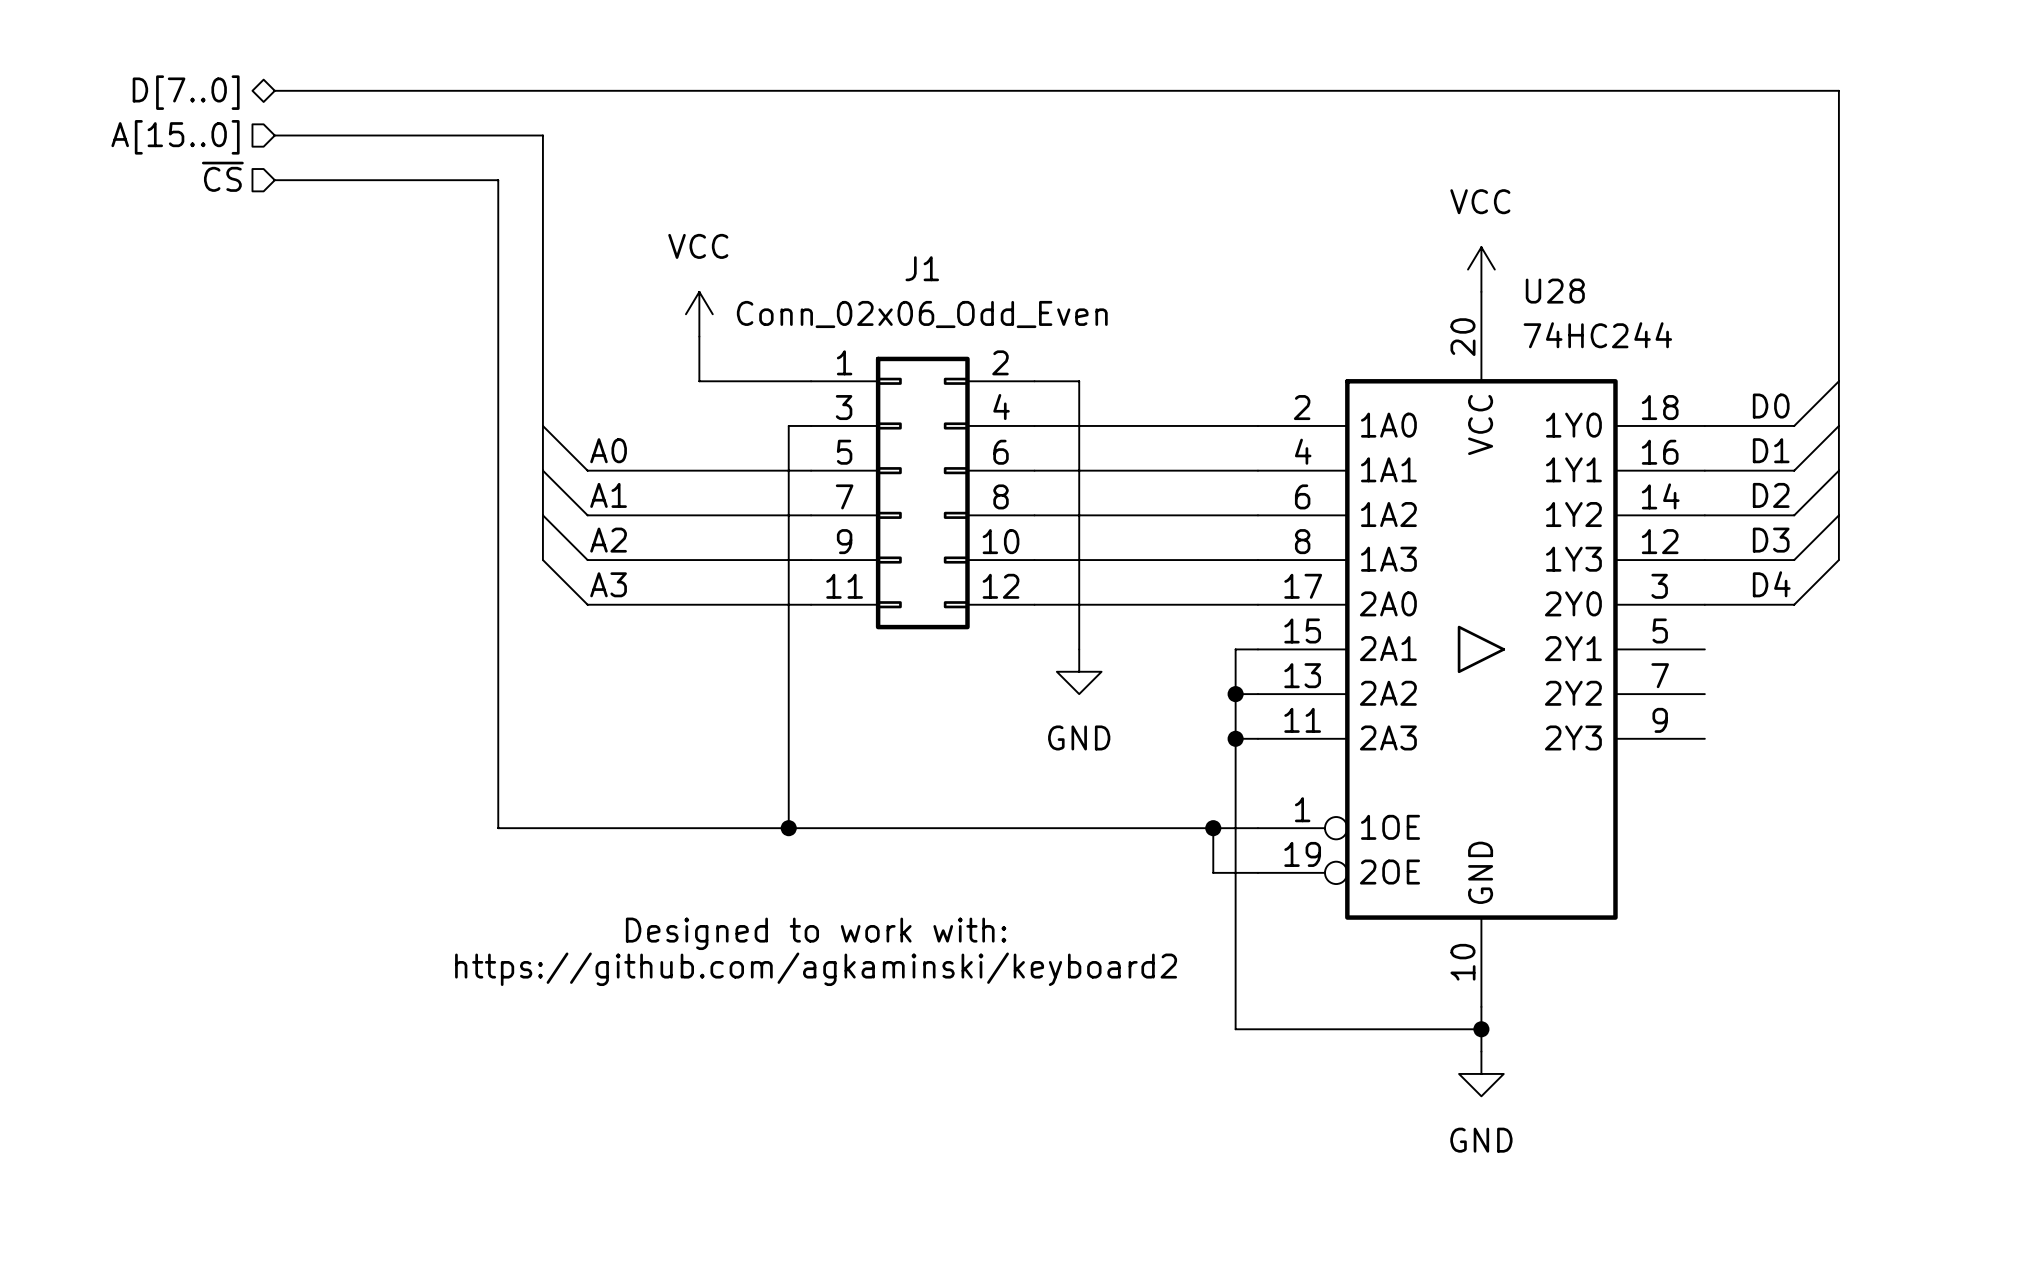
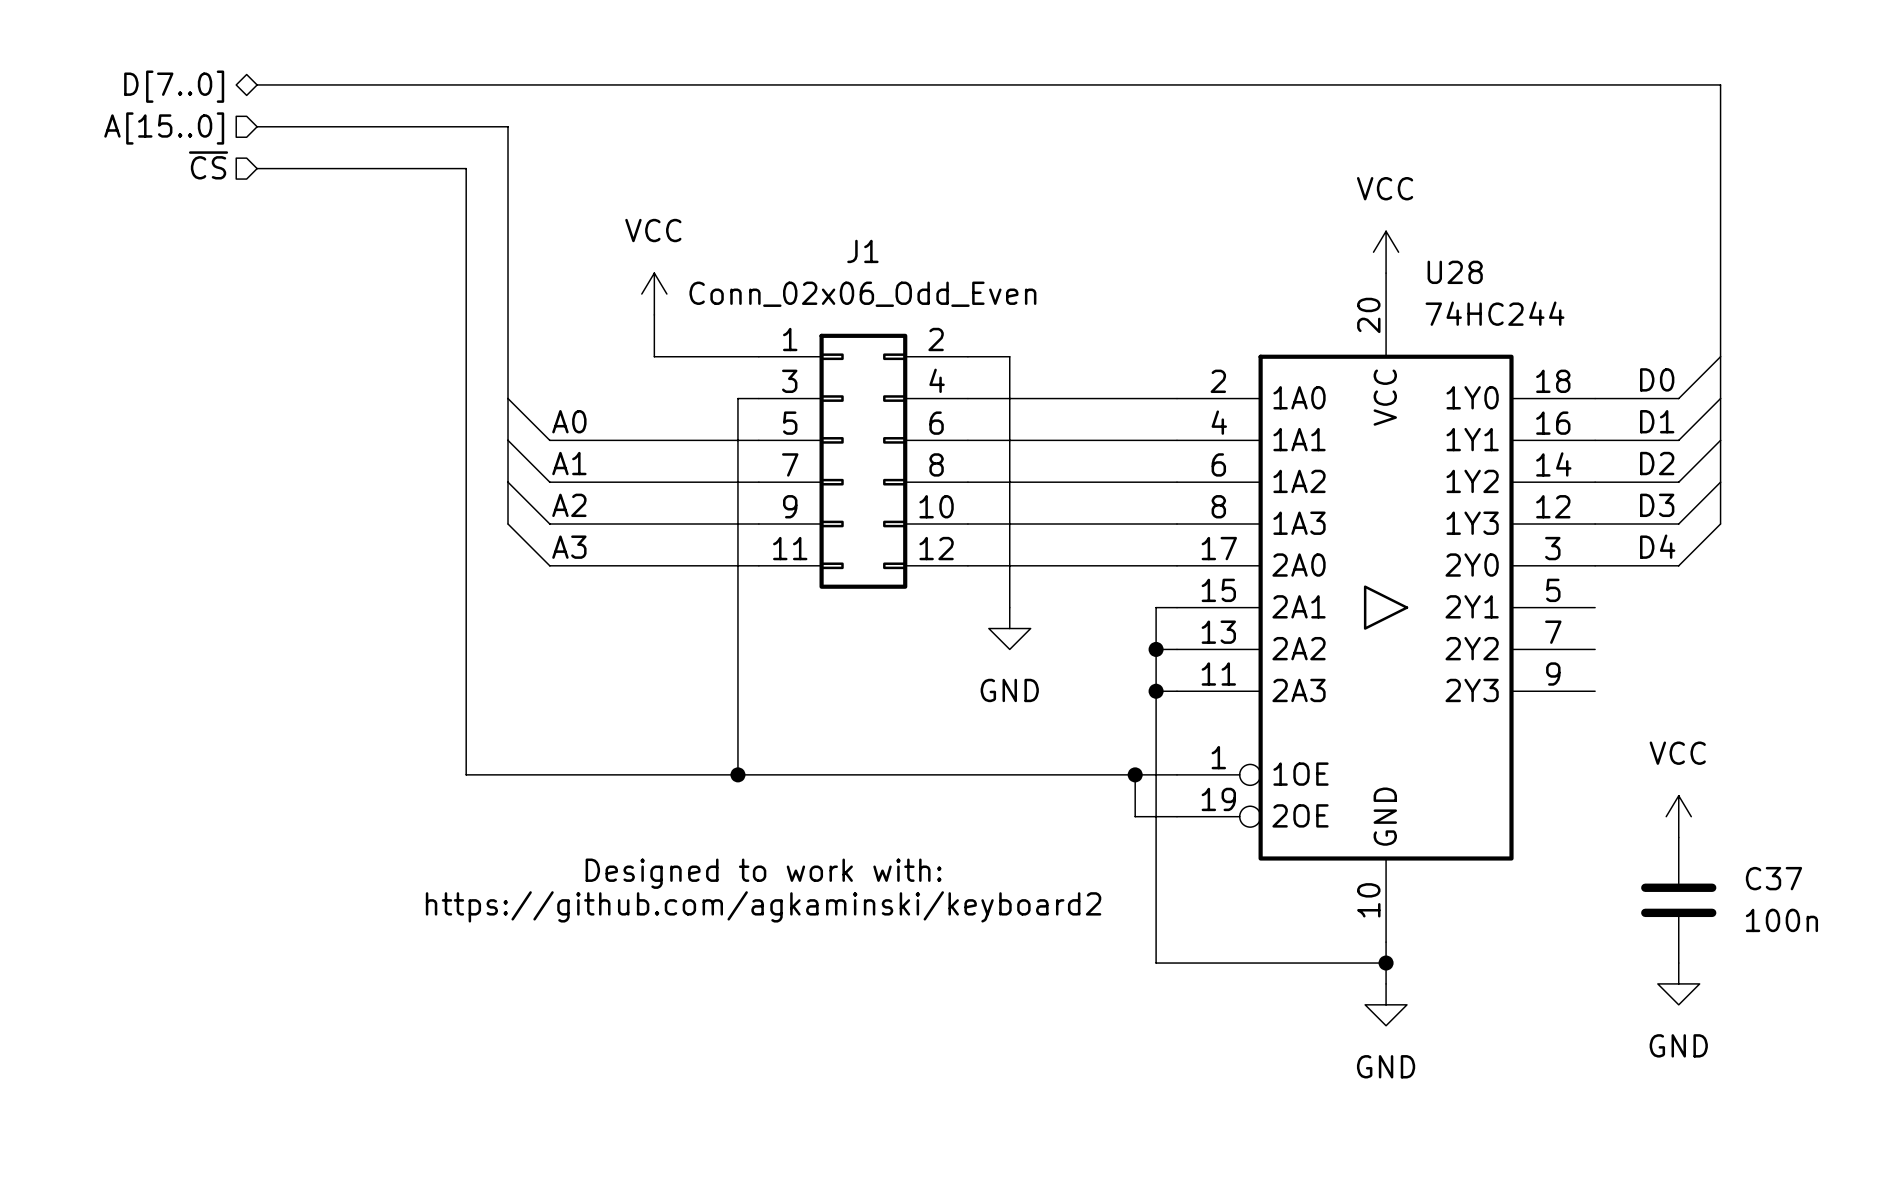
power symbol: none -> VCC (1678, 816)
C37: none -> 100n (1678, 900)
power symbol: none -> GND (1678, 983)

